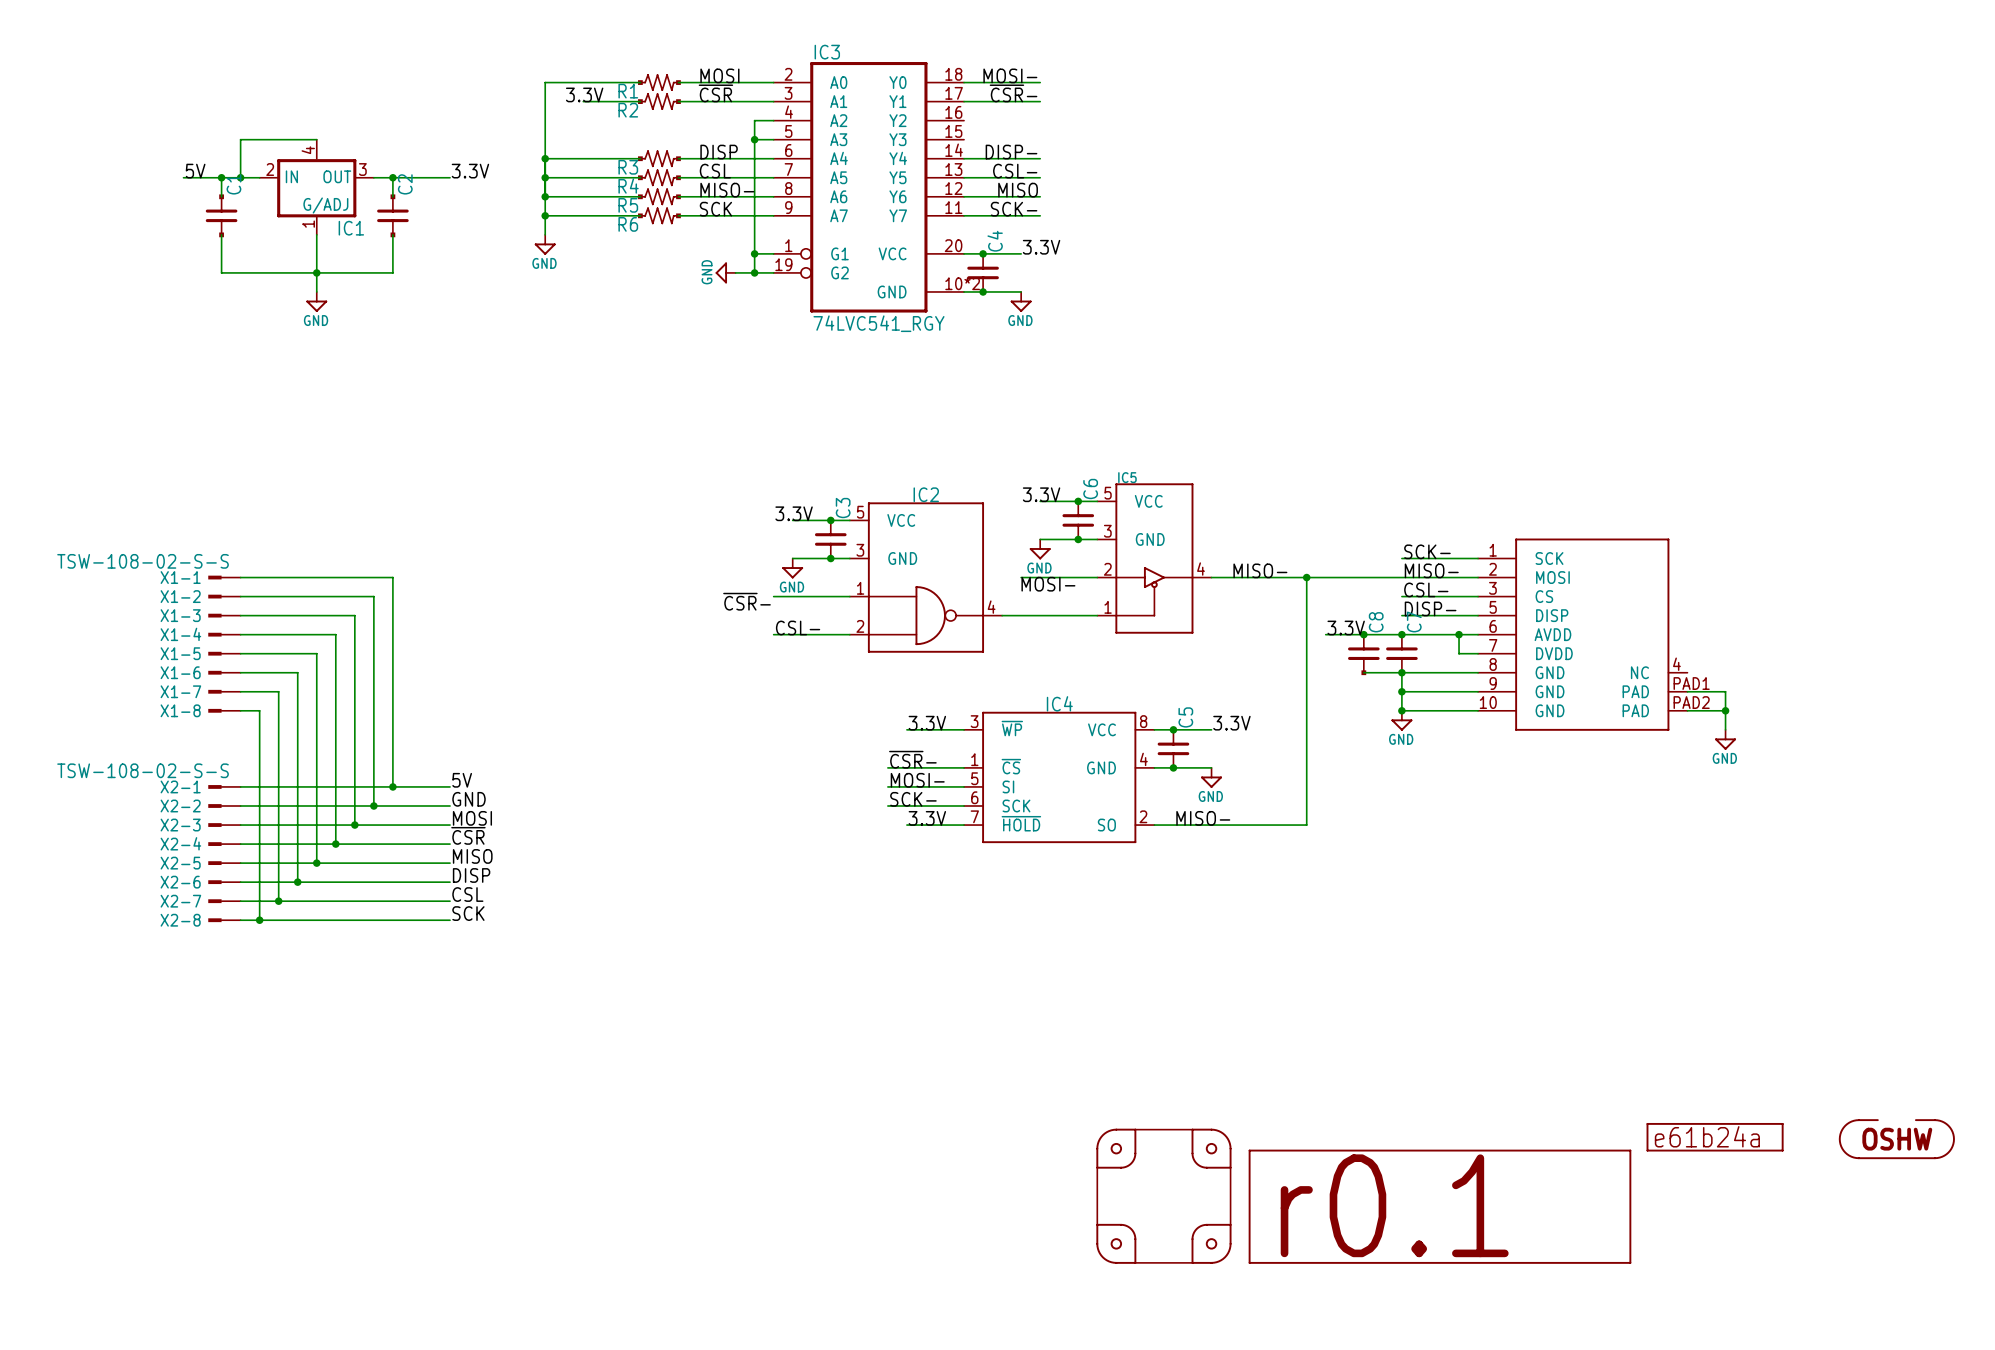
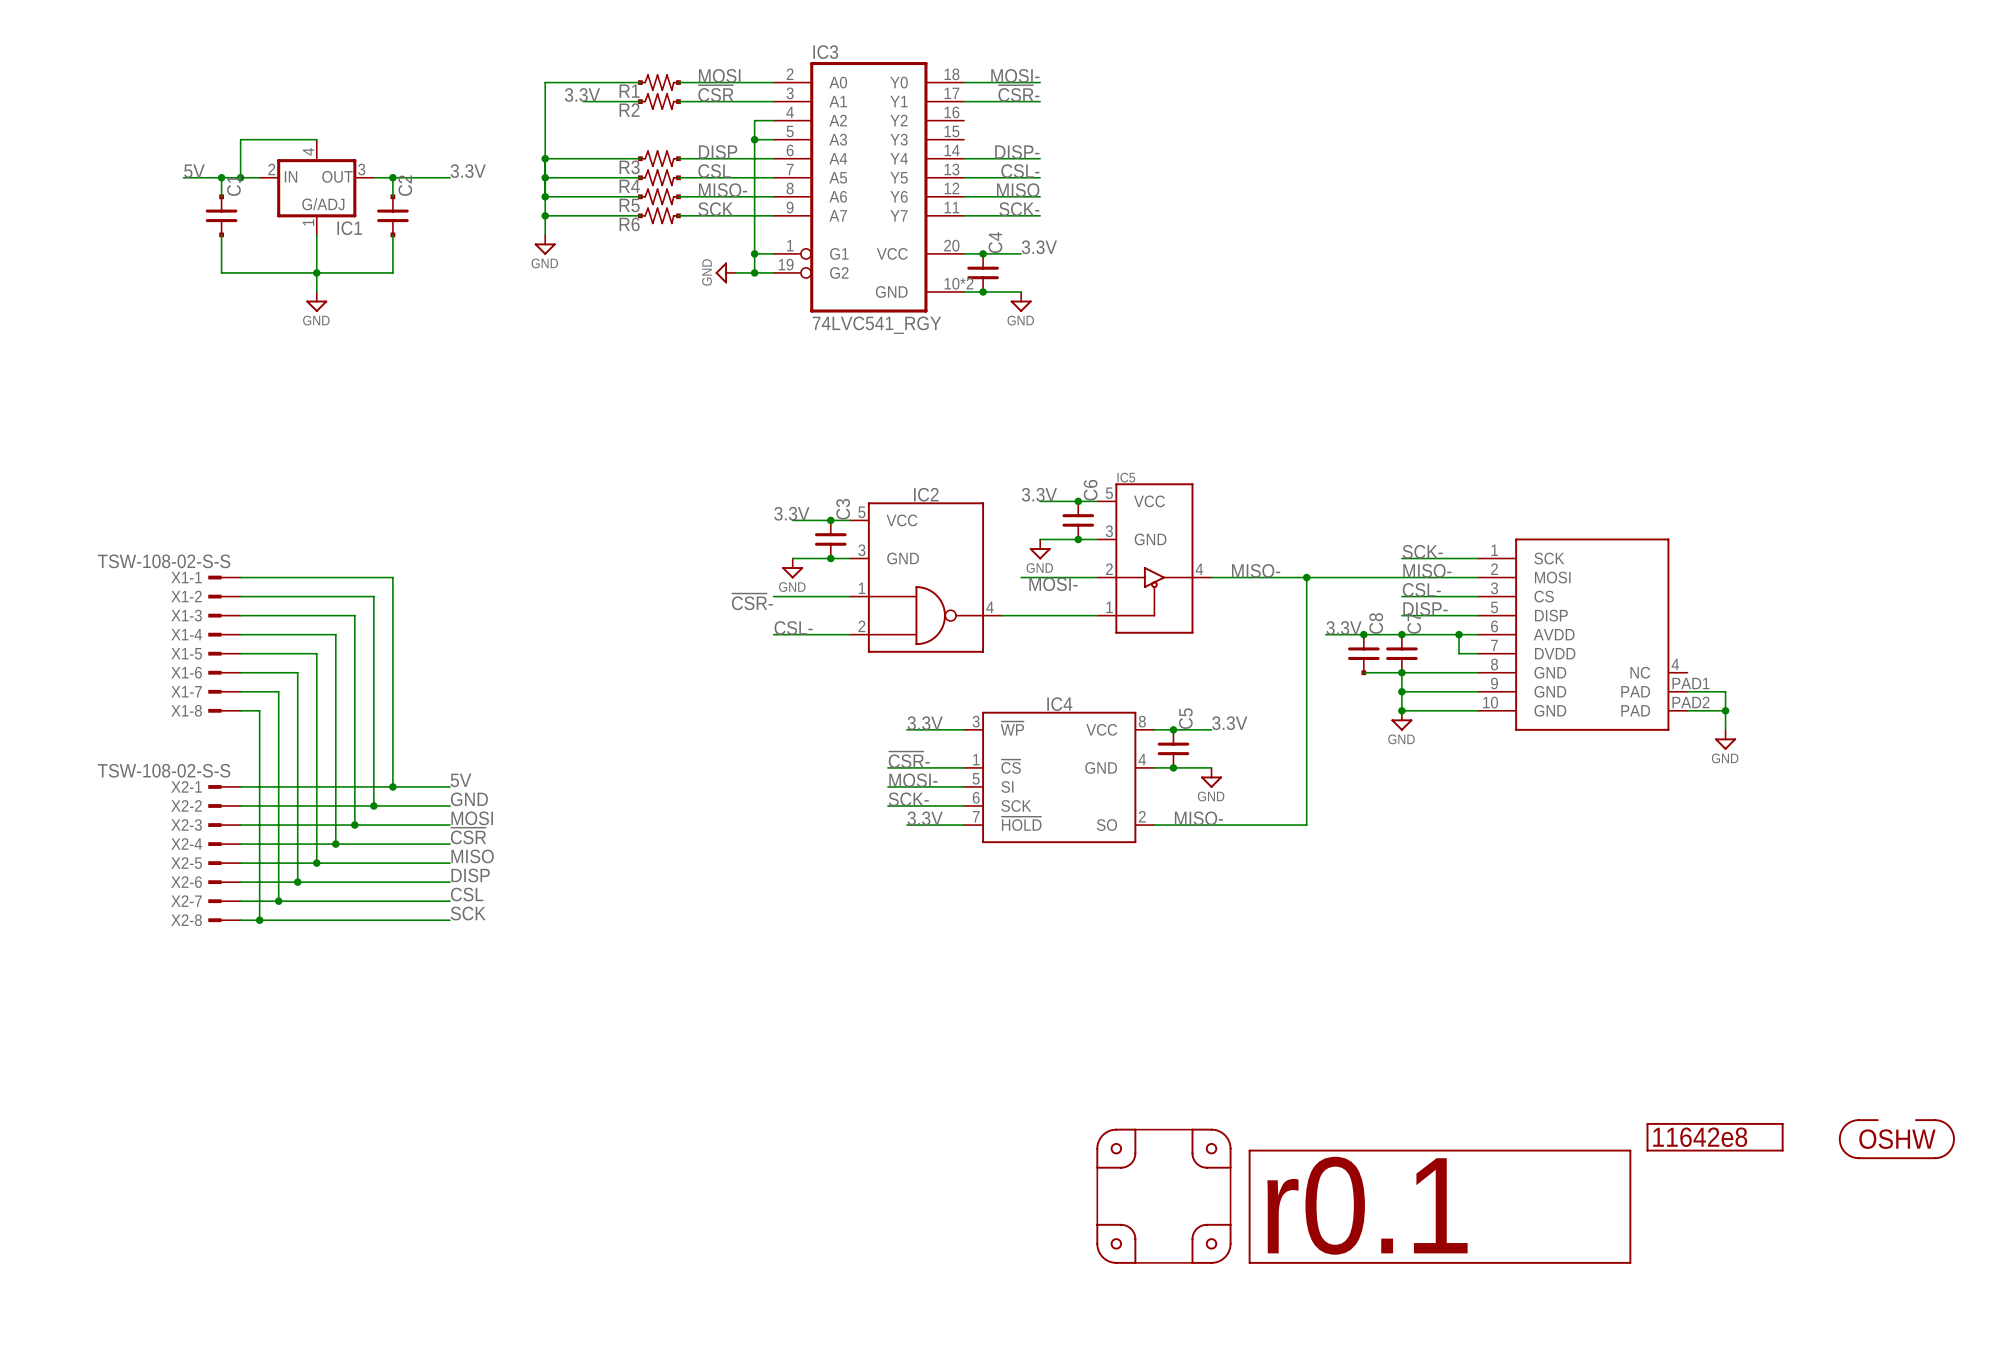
part value: e61b24a (1707, 1136) -> 11642e8 (1700, 1137)

